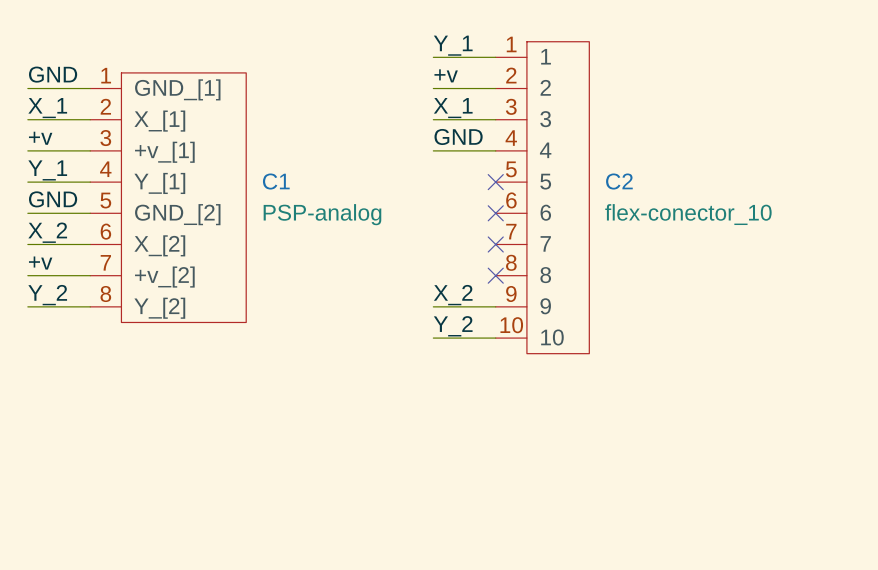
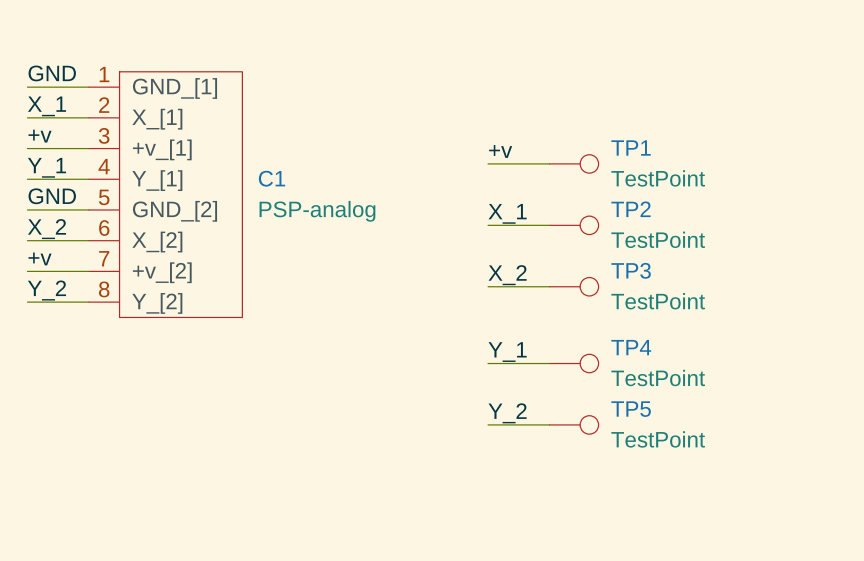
label: Y_1 (453, 45) -> none
wire: (433, 57) (495, 57) -> none
label position: +v (446, 75) -> +v (500, 151)
wire: (433, 88) (495, 88) -> (488, 163) (549, 163)
label position: X_1 (453, 108) -> X_1 (507, 213)
wire: (433, 119) (495, 119) -> (488, 286) (549, 286)
label: GND (458, 136) -> none
wire: (433, 150) (495, 150) -> (488, 225) (549, 225)
TP1: none -> TestPoint (574, 163)
no-connect mark: (495, 182) -> none
C2: flex-conector_10 (542, 197) -> none
no-connect mark: (495, 213) -> none
TP2: none -> TestPoint (574, 225)
no-connect mark: (495, 244) -> none
no-connect mark: (495, 275) -> none
TP3: none -> TestPoint (574, 286)
label position: X_2 (453, 295) -> X_2 (507, 275)
wire: (433, 306) (495, 306) -> (488, 424) (549, 424)
label position: Y_2 (453, 326) -> Y_2 (507, 413)
wire: (433, 338) (495, 338) -> (488, 363) (549, 363)
label: none -> Y_1 (507, 352)
TP4: none -> TestPoint (574, 363)
TP5: none -> TestPoint (574, 424)

